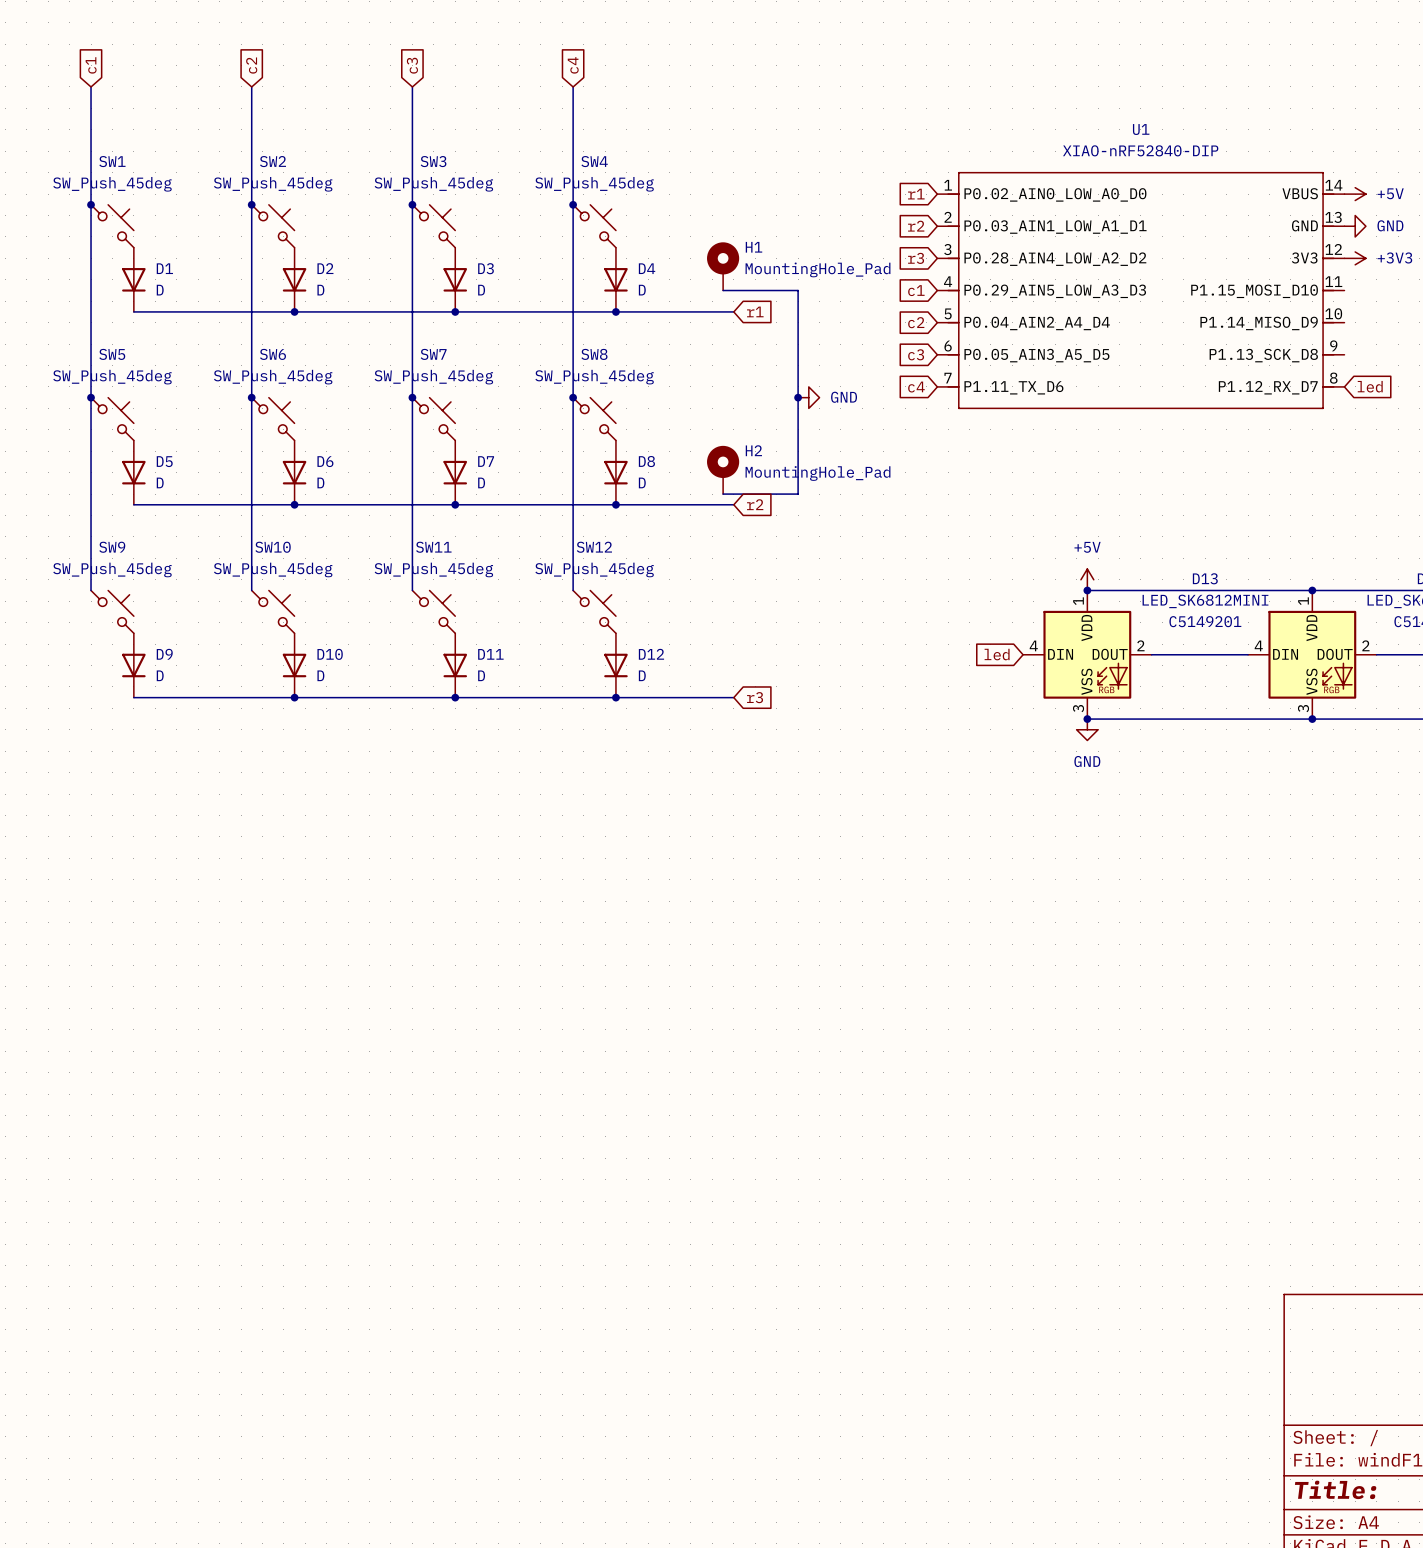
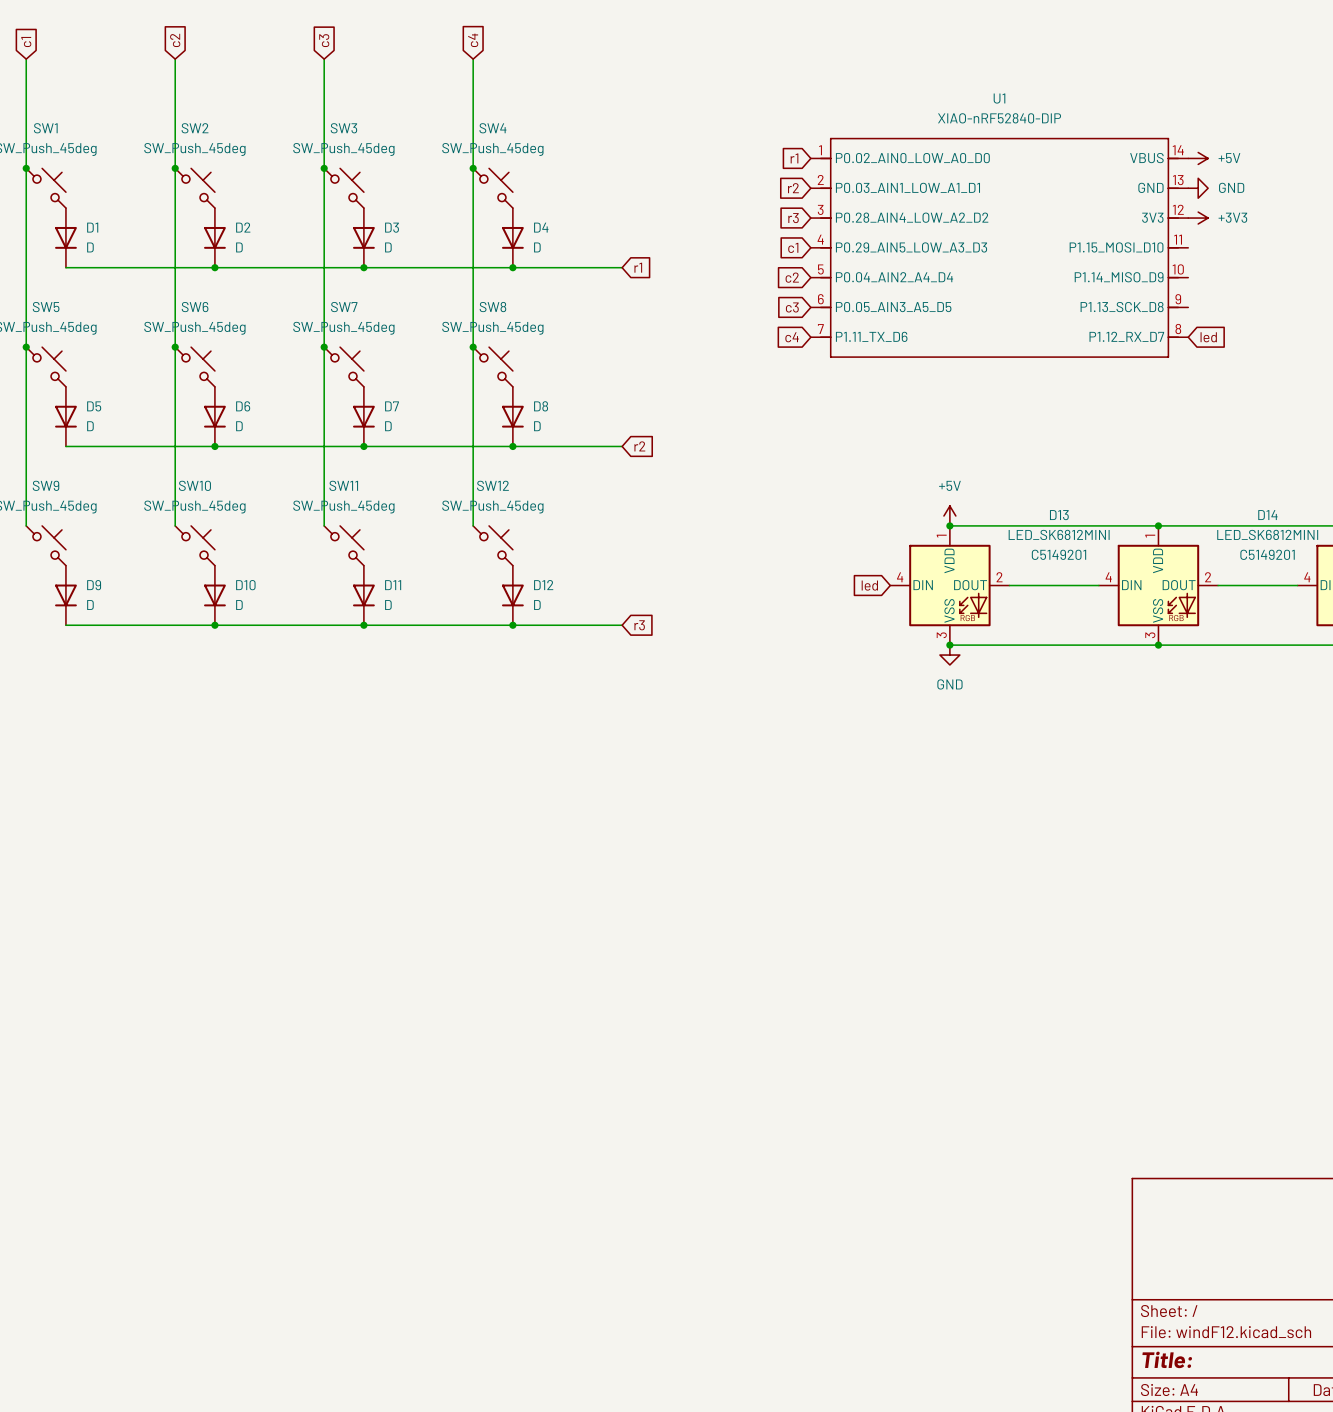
H1: MountingHole_Pad (723, 266) -> none
wire: (723, 290) (798, 290) (798, 494) (723, 494) -> none
junction: (798, 397) -> none
power symbol: GND (808, 397) -> none
H2: MountingHole_Pad (723, 469) -> none

